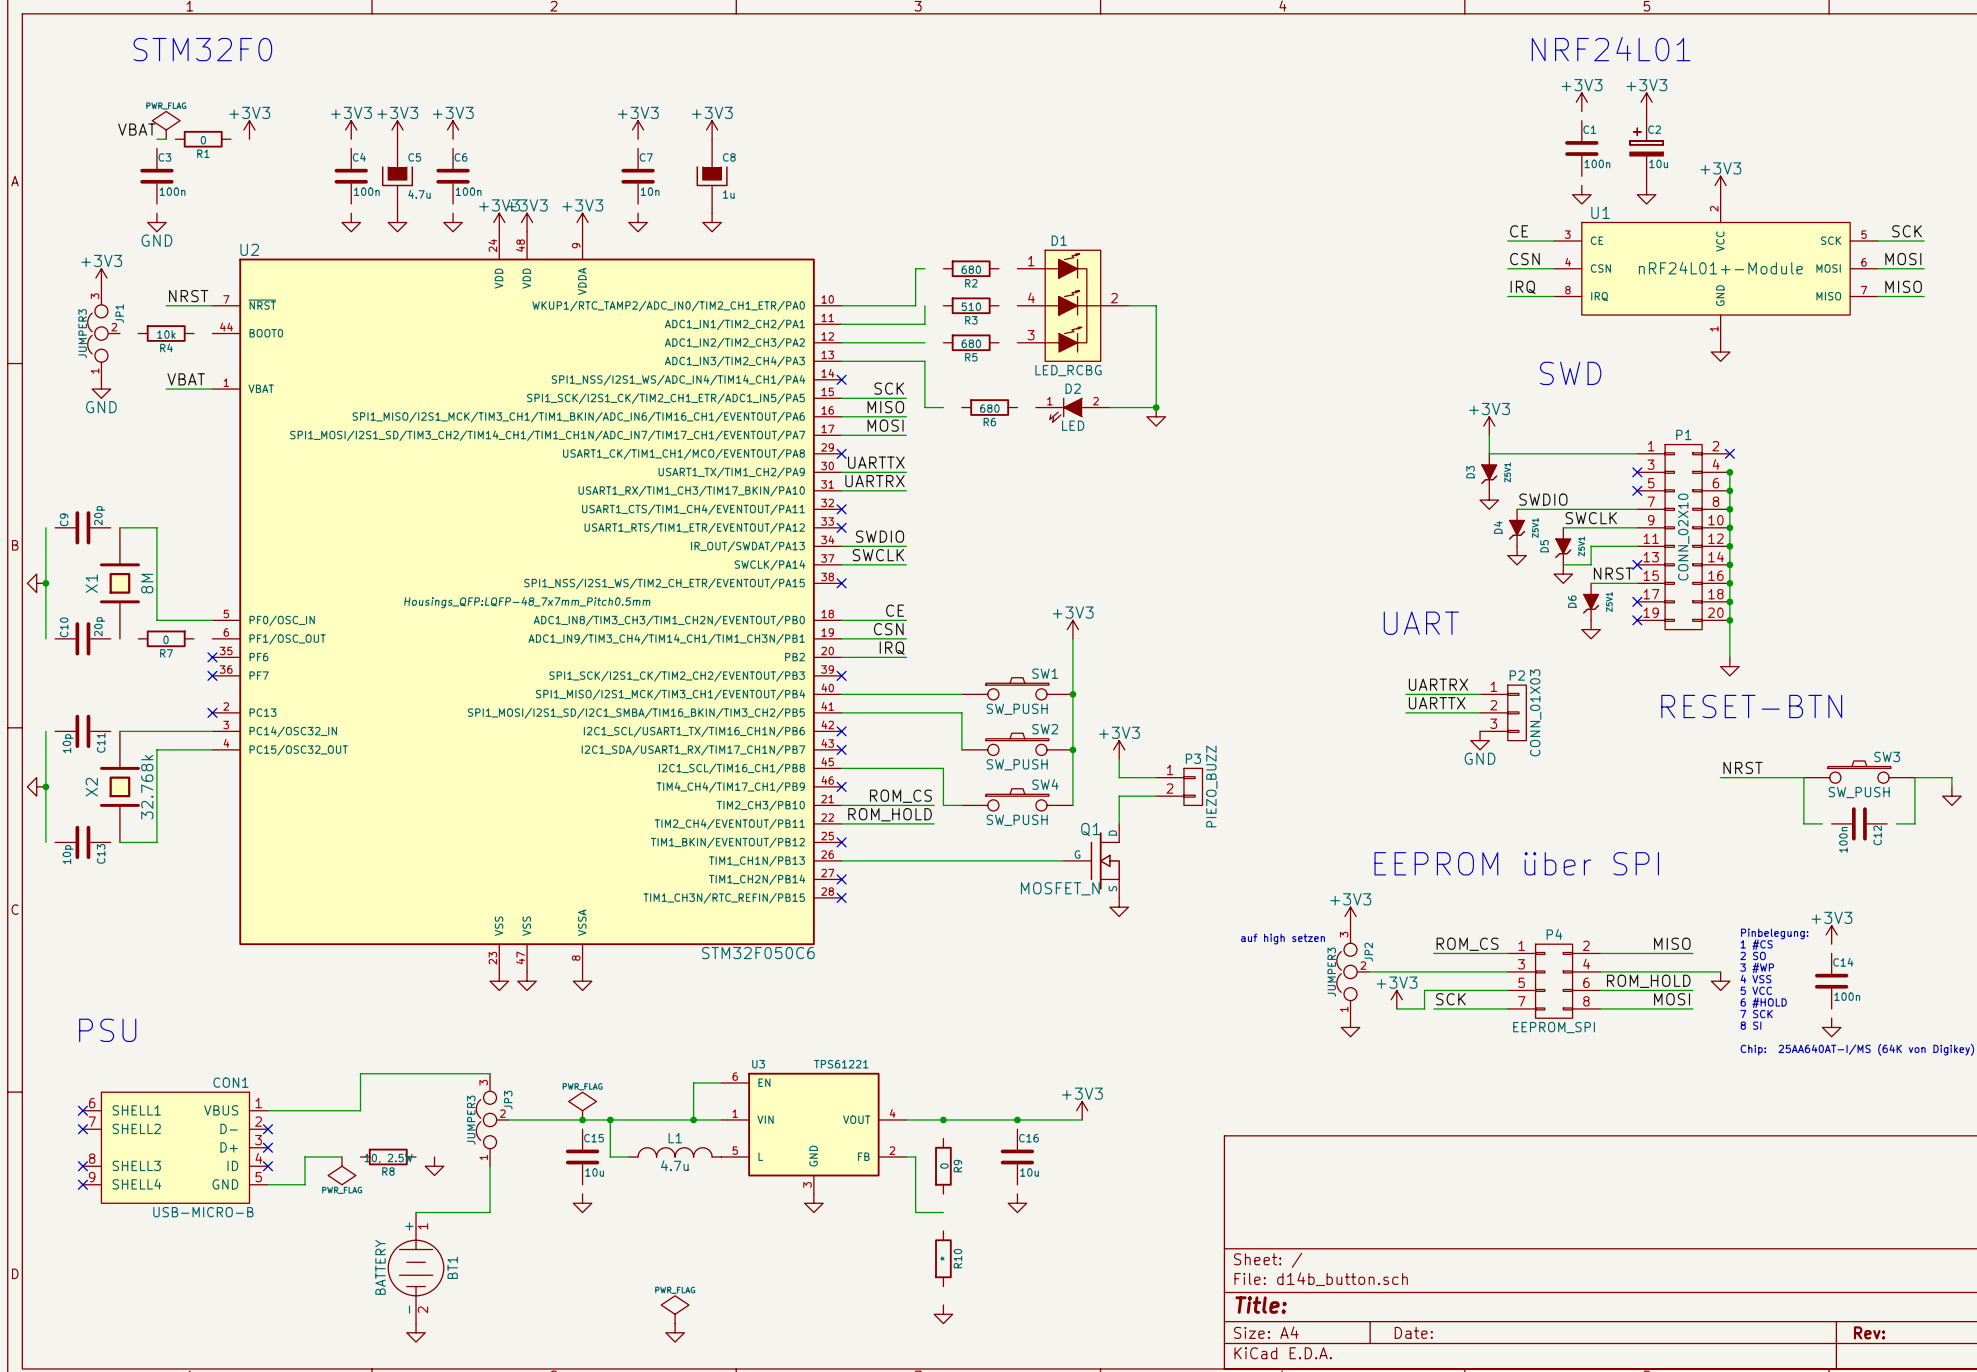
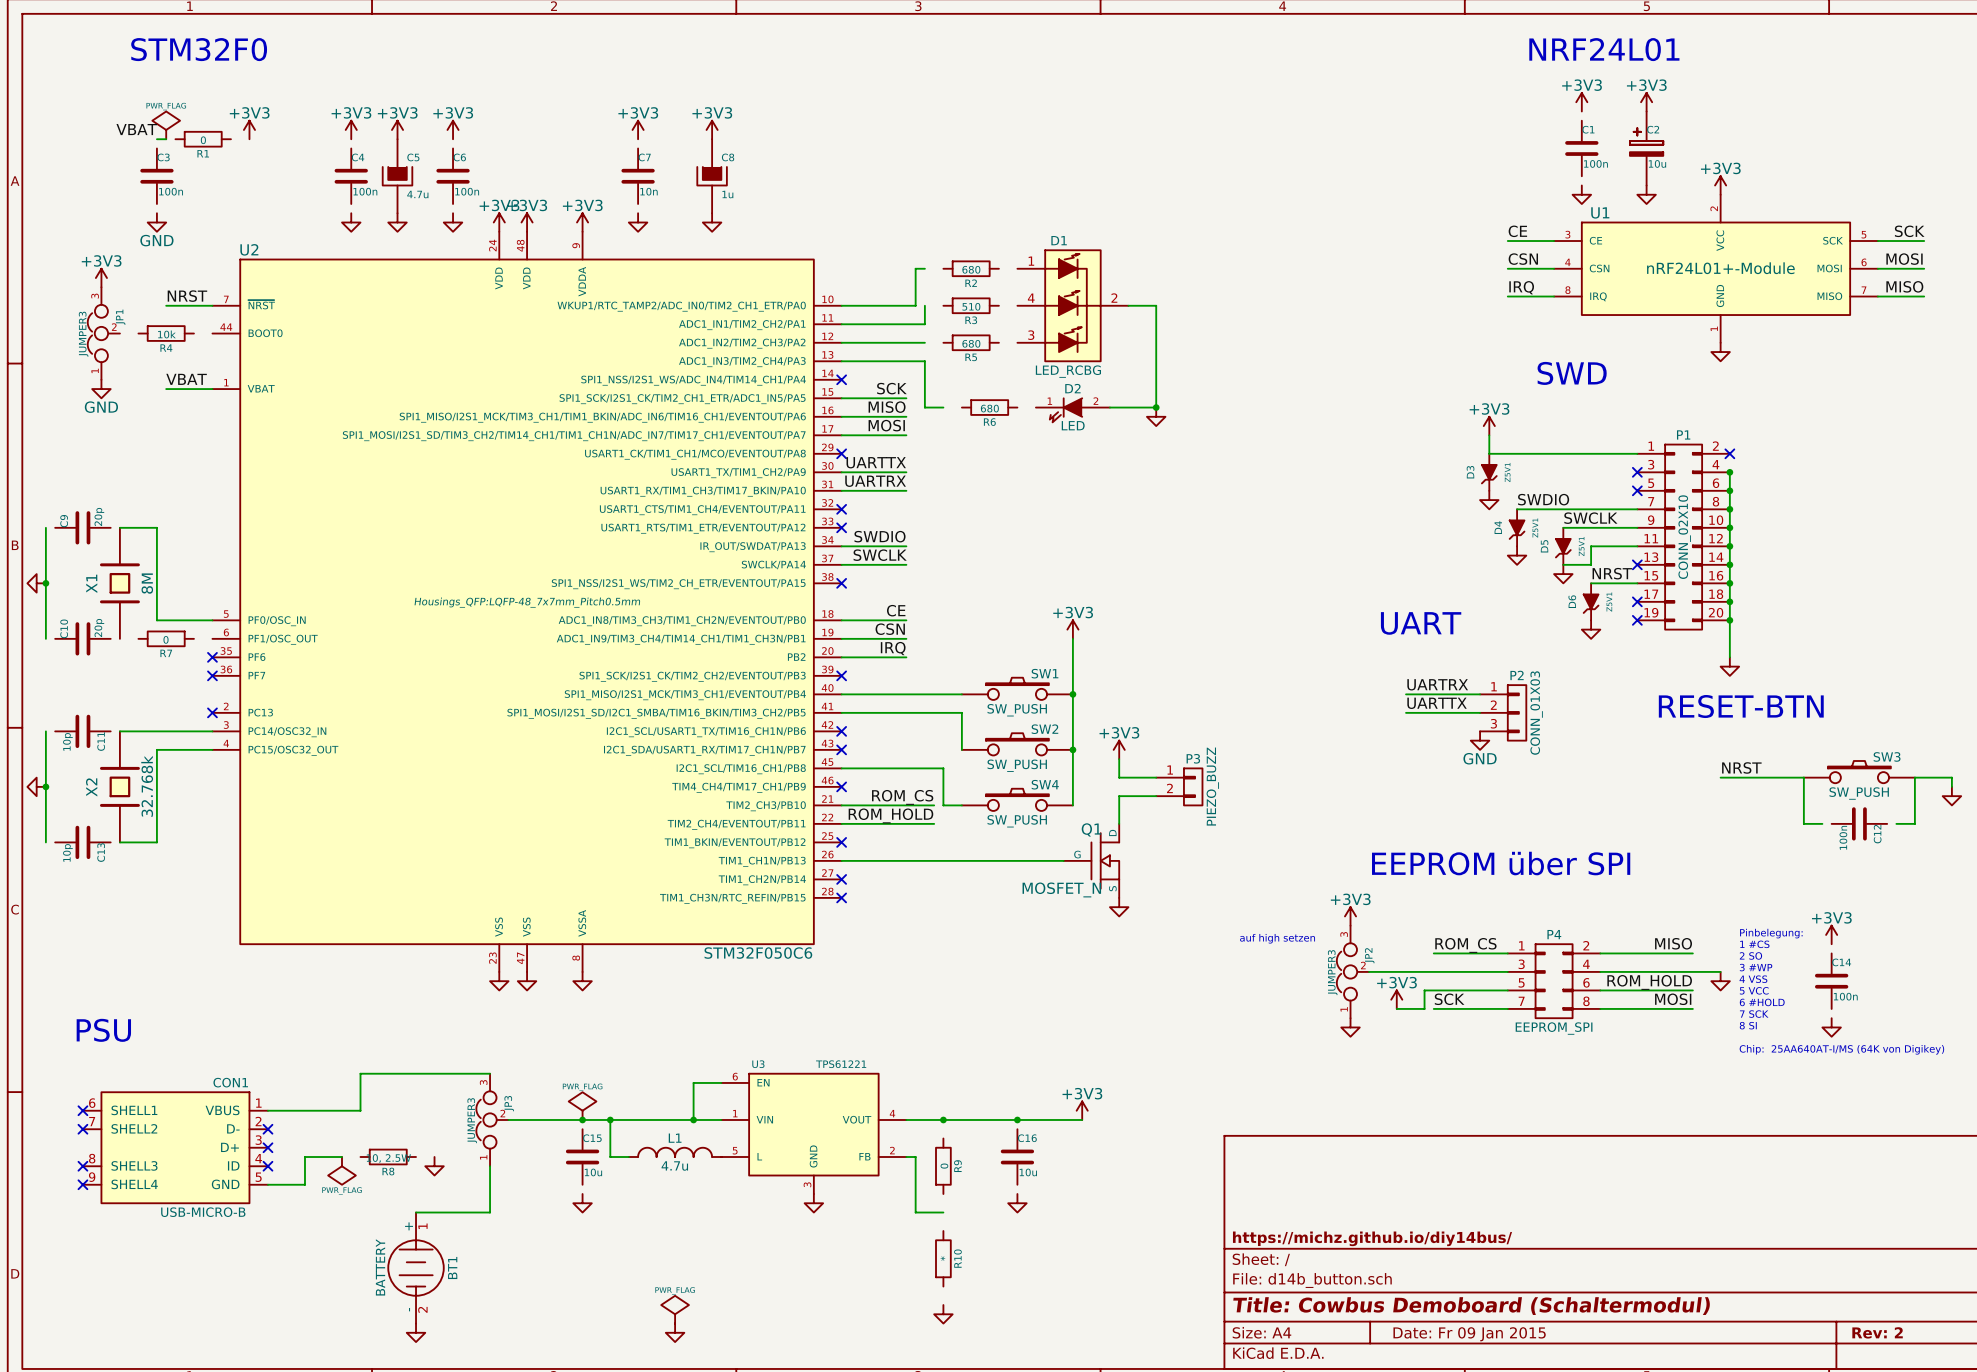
title block: none -> https://michz.github.io/diy14bus/ (1372, 1238)
title block: Title: (1261, 1305) -> Title: Cowbus Demoboard (Schaltermodul) (1471, 1306)
title block: Date: (1413, 1332) -> Date: Fr 09 Jan 2015 (1469, 1334)
title block: Rev: (1869, 1332) -> Rev: 2 (1877, 1332)

